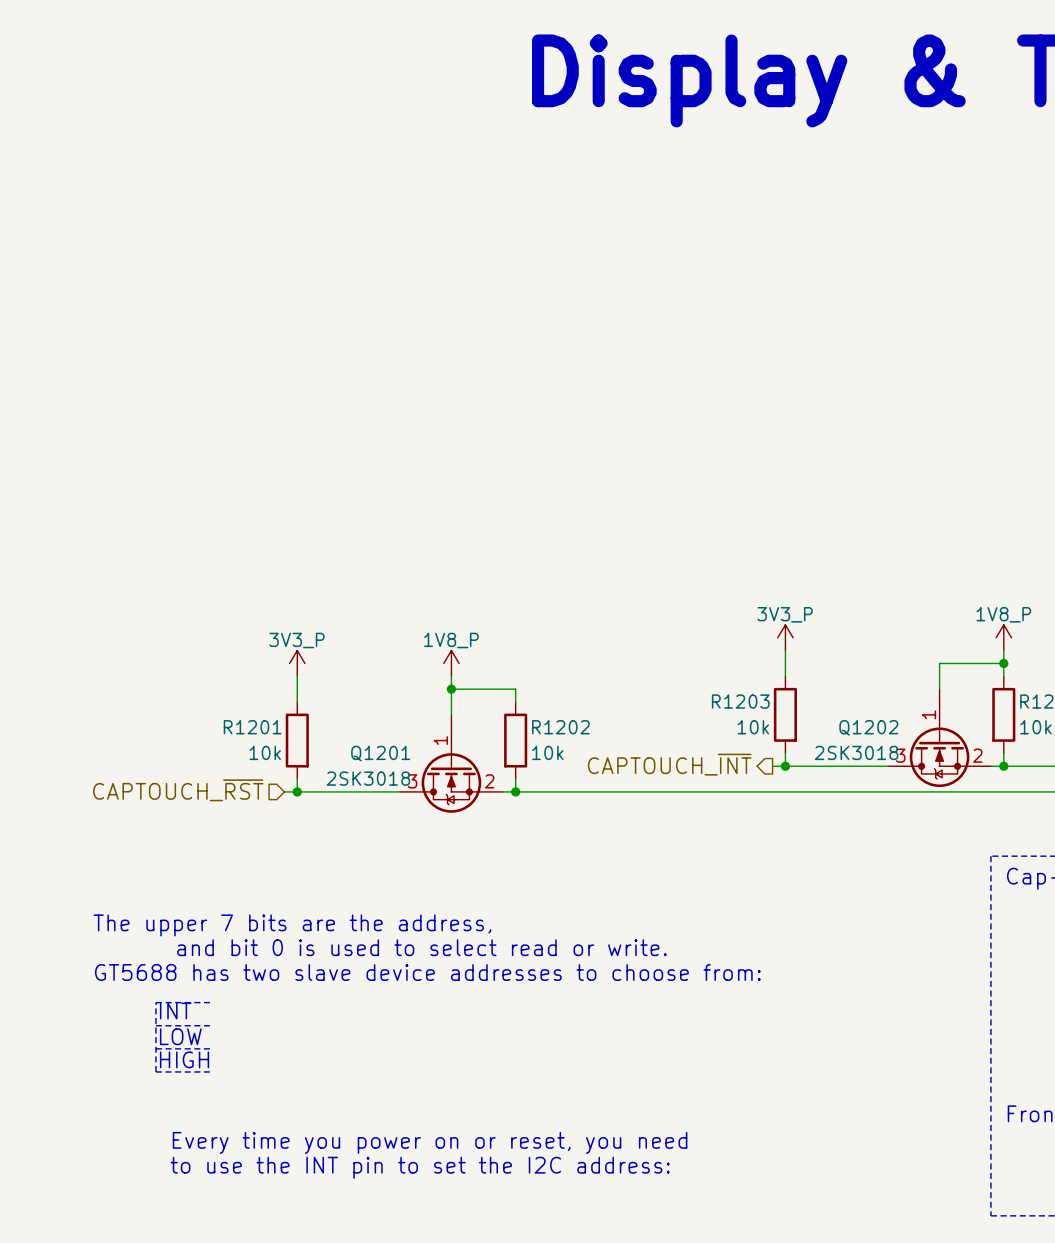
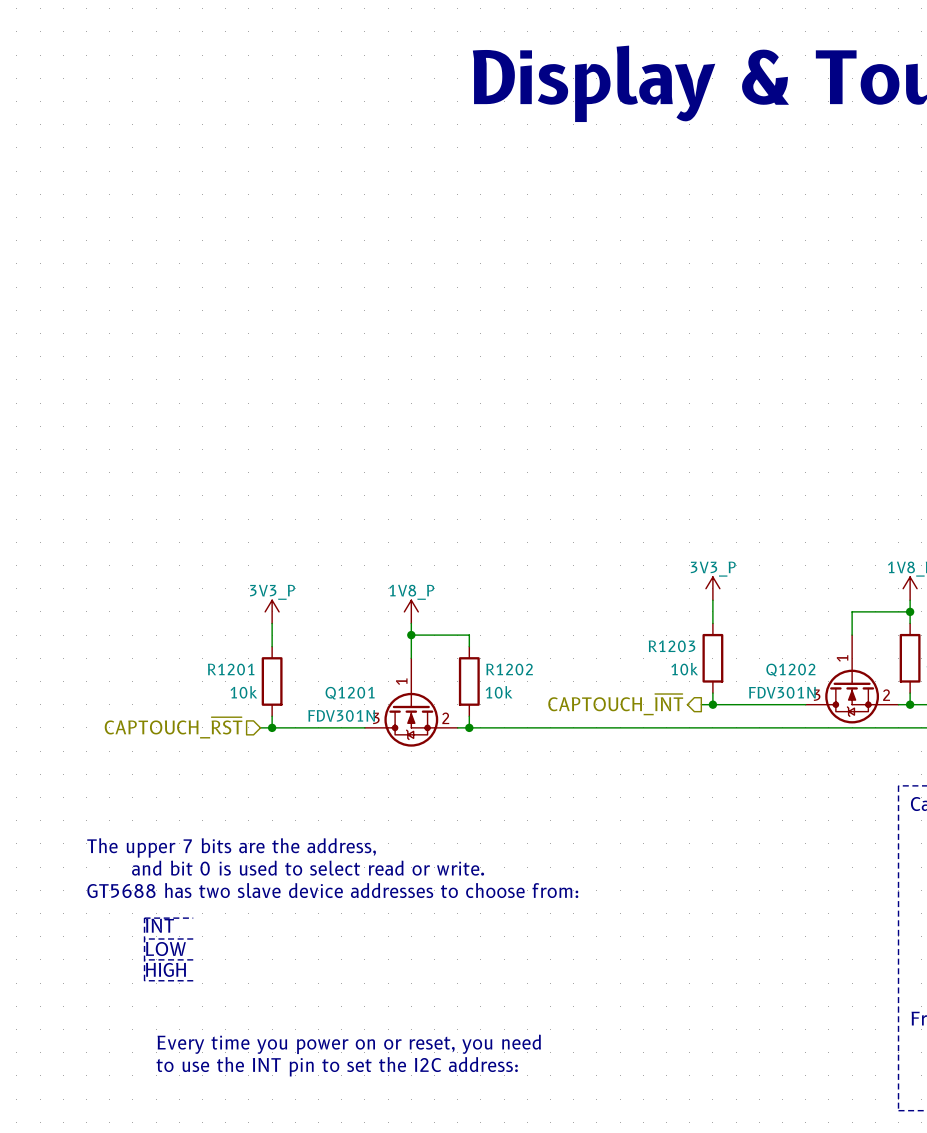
Q1202 value: 2SK3018 (856, 752) -> FDV301N (782, 692)
Q1201 value: 2SK3018 (368, 778) -> FDV301N (341, 715)

